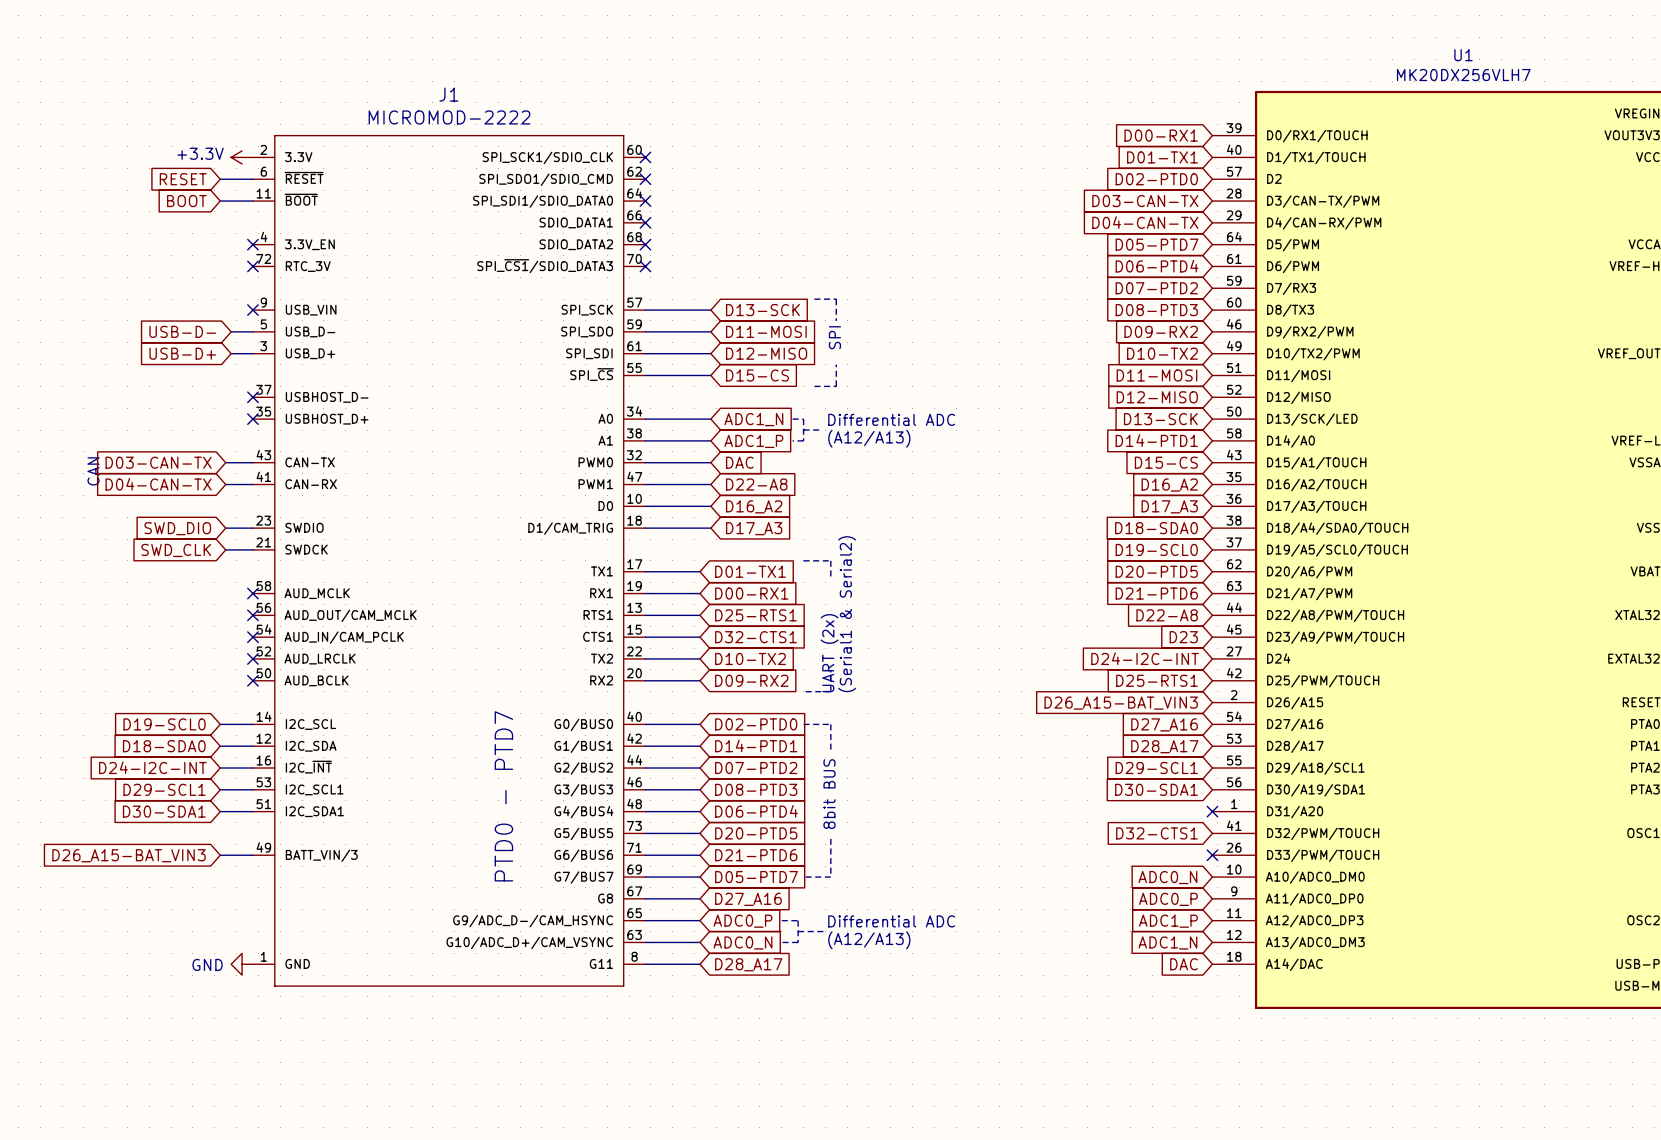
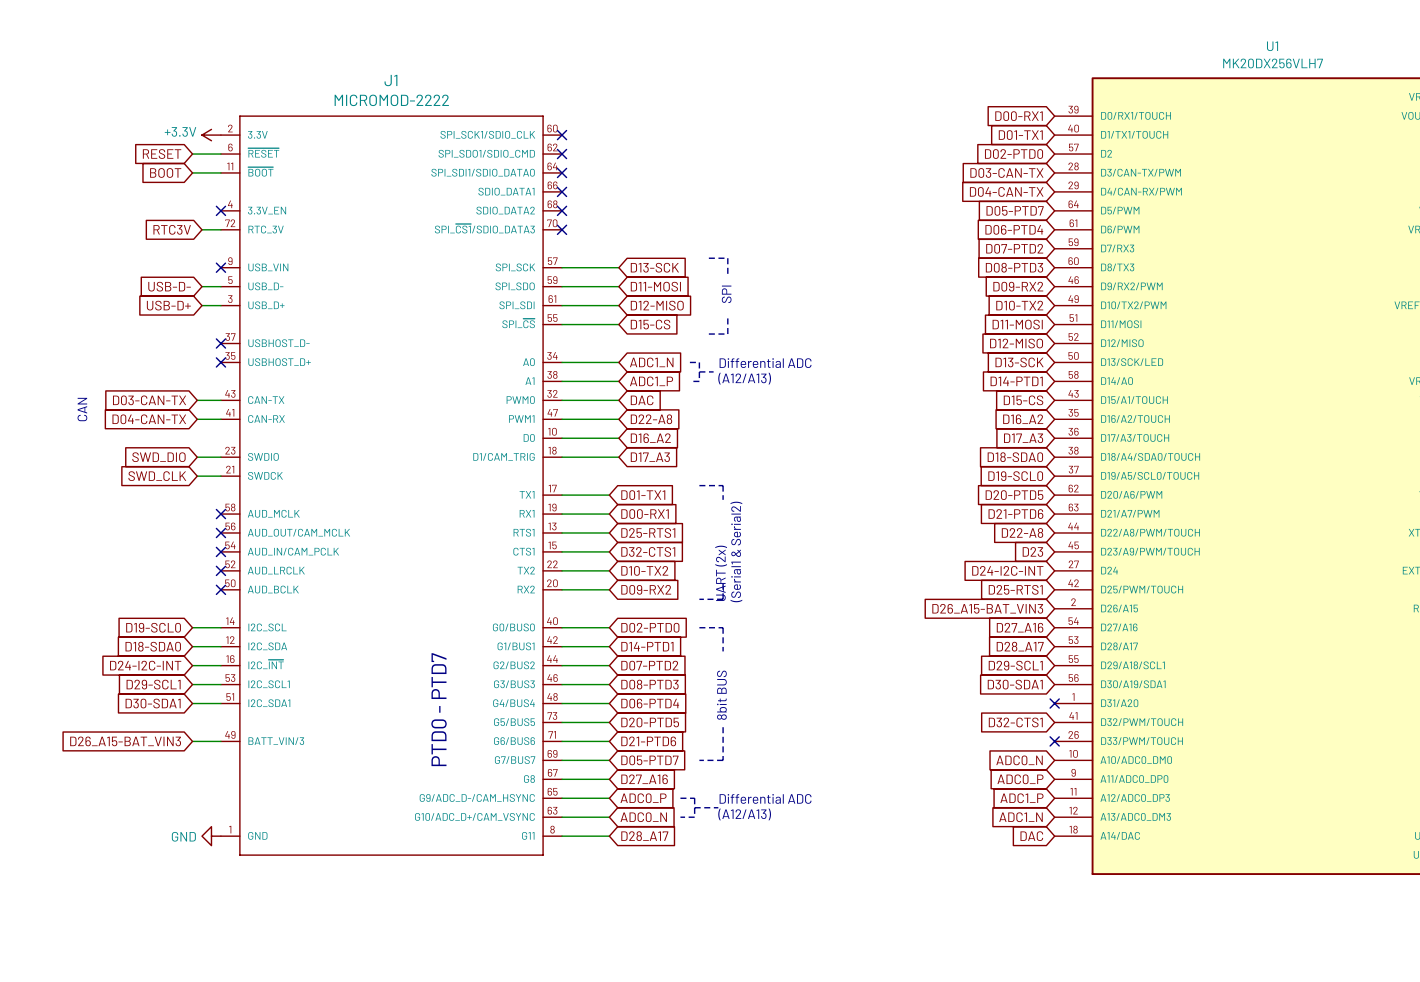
global label: none -> RTC3V (172, 229)
wire: none -> (201, 229) (220, 229)
no-connect mark: (252, 266) -> none

